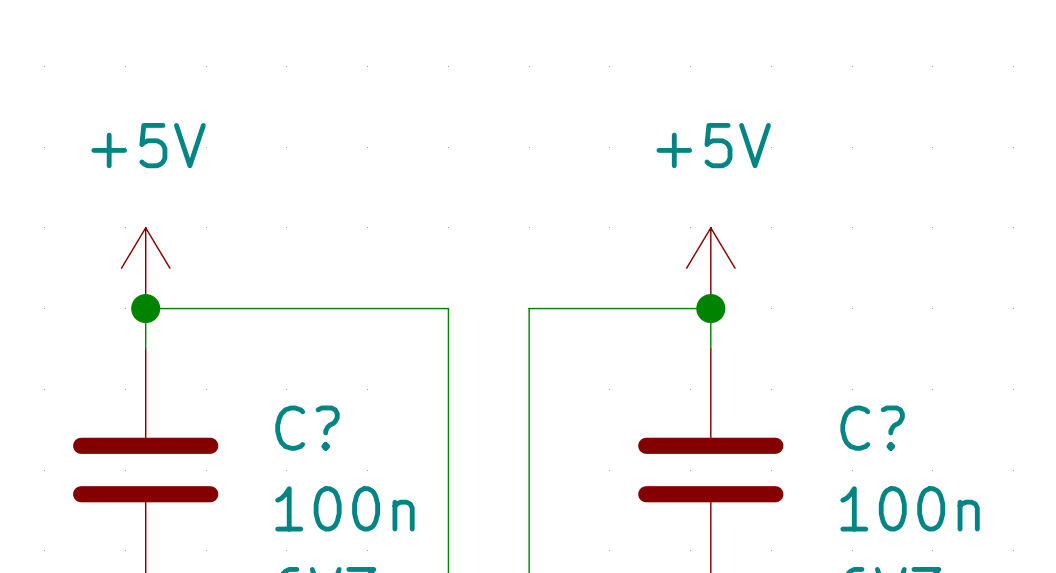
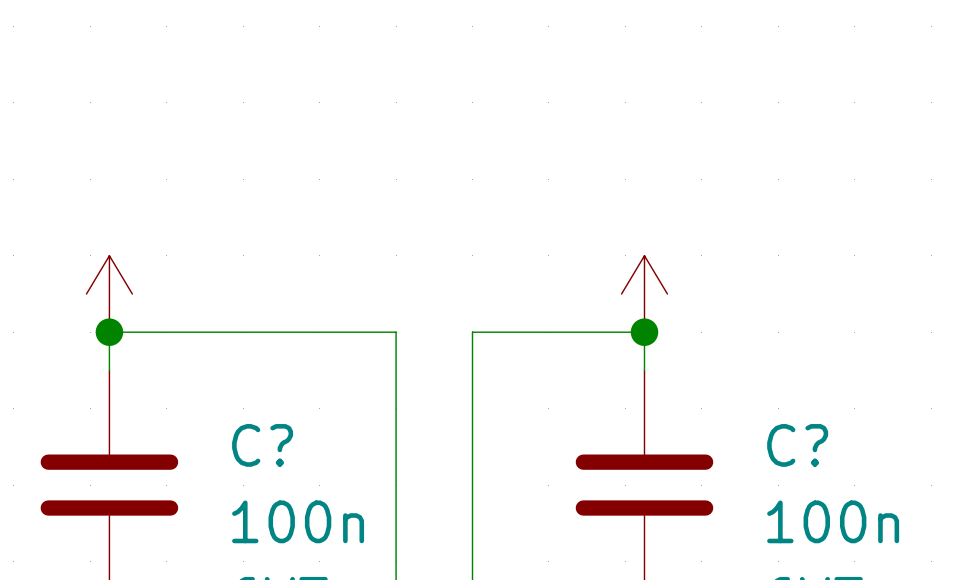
power symbol text: +5V (148, 145) -> none
power symbol text: +5V (713, 145) -> none

